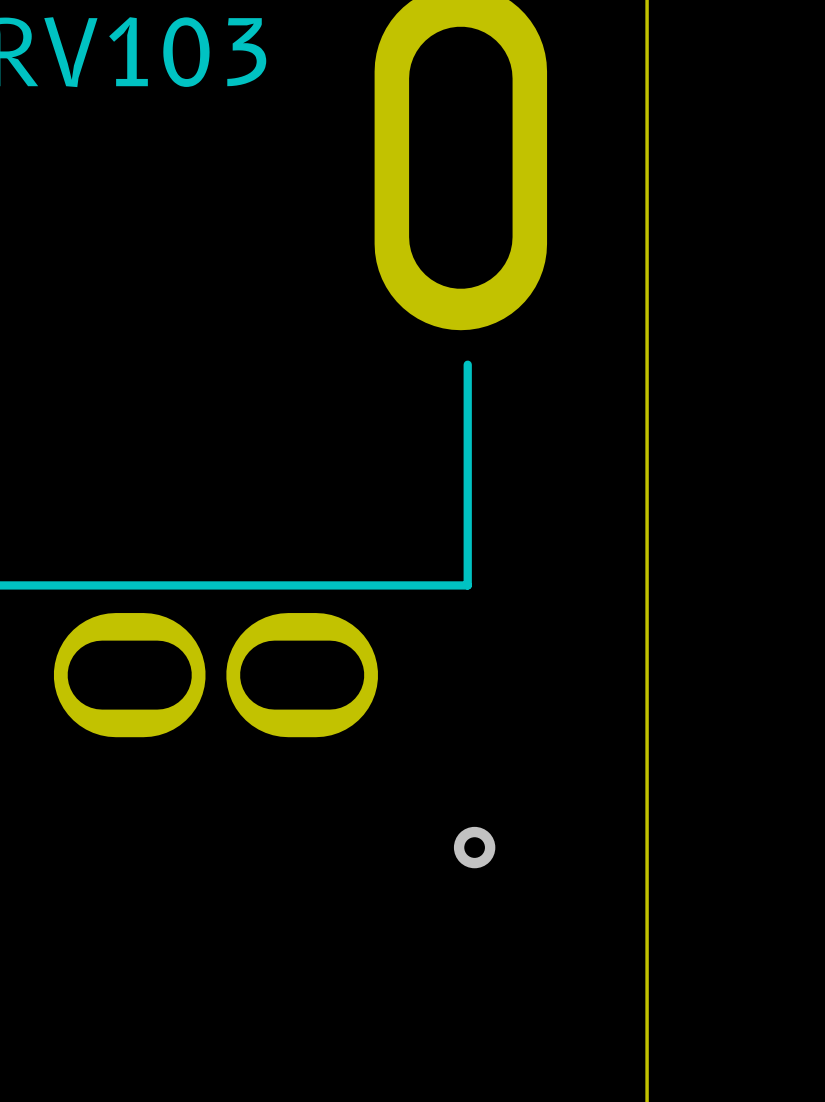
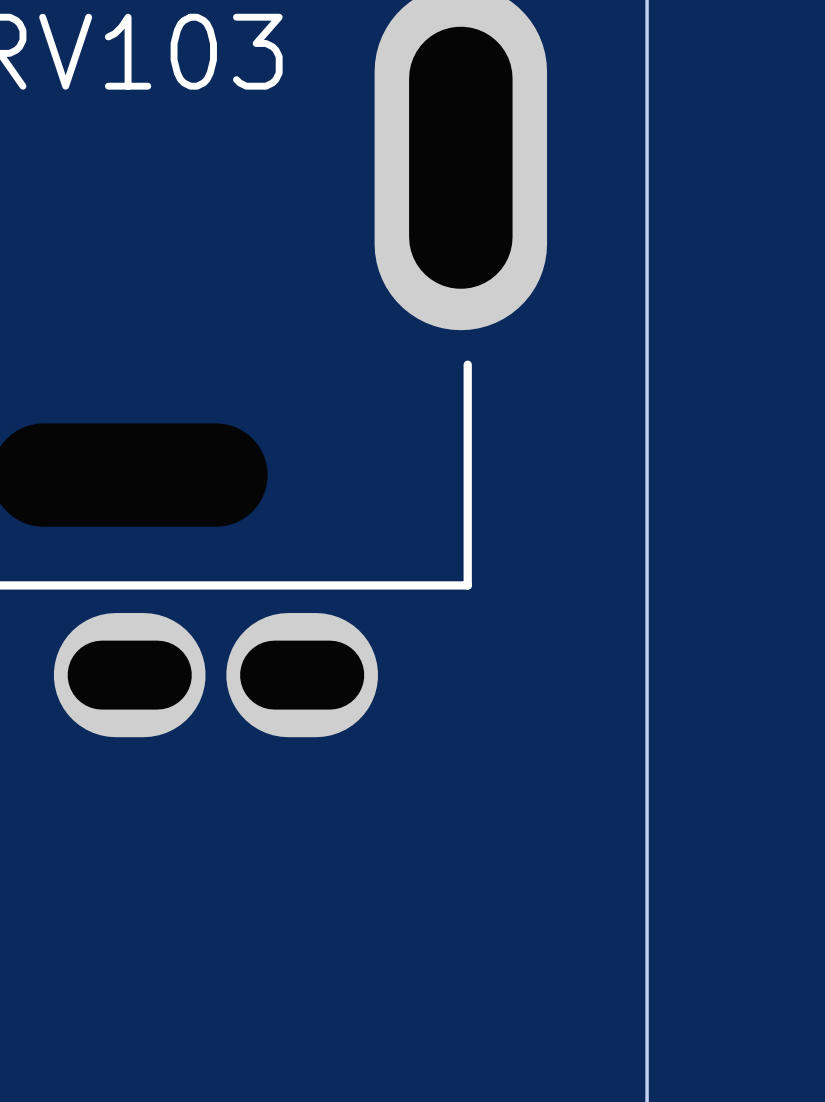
via: (474, 847) -> none

